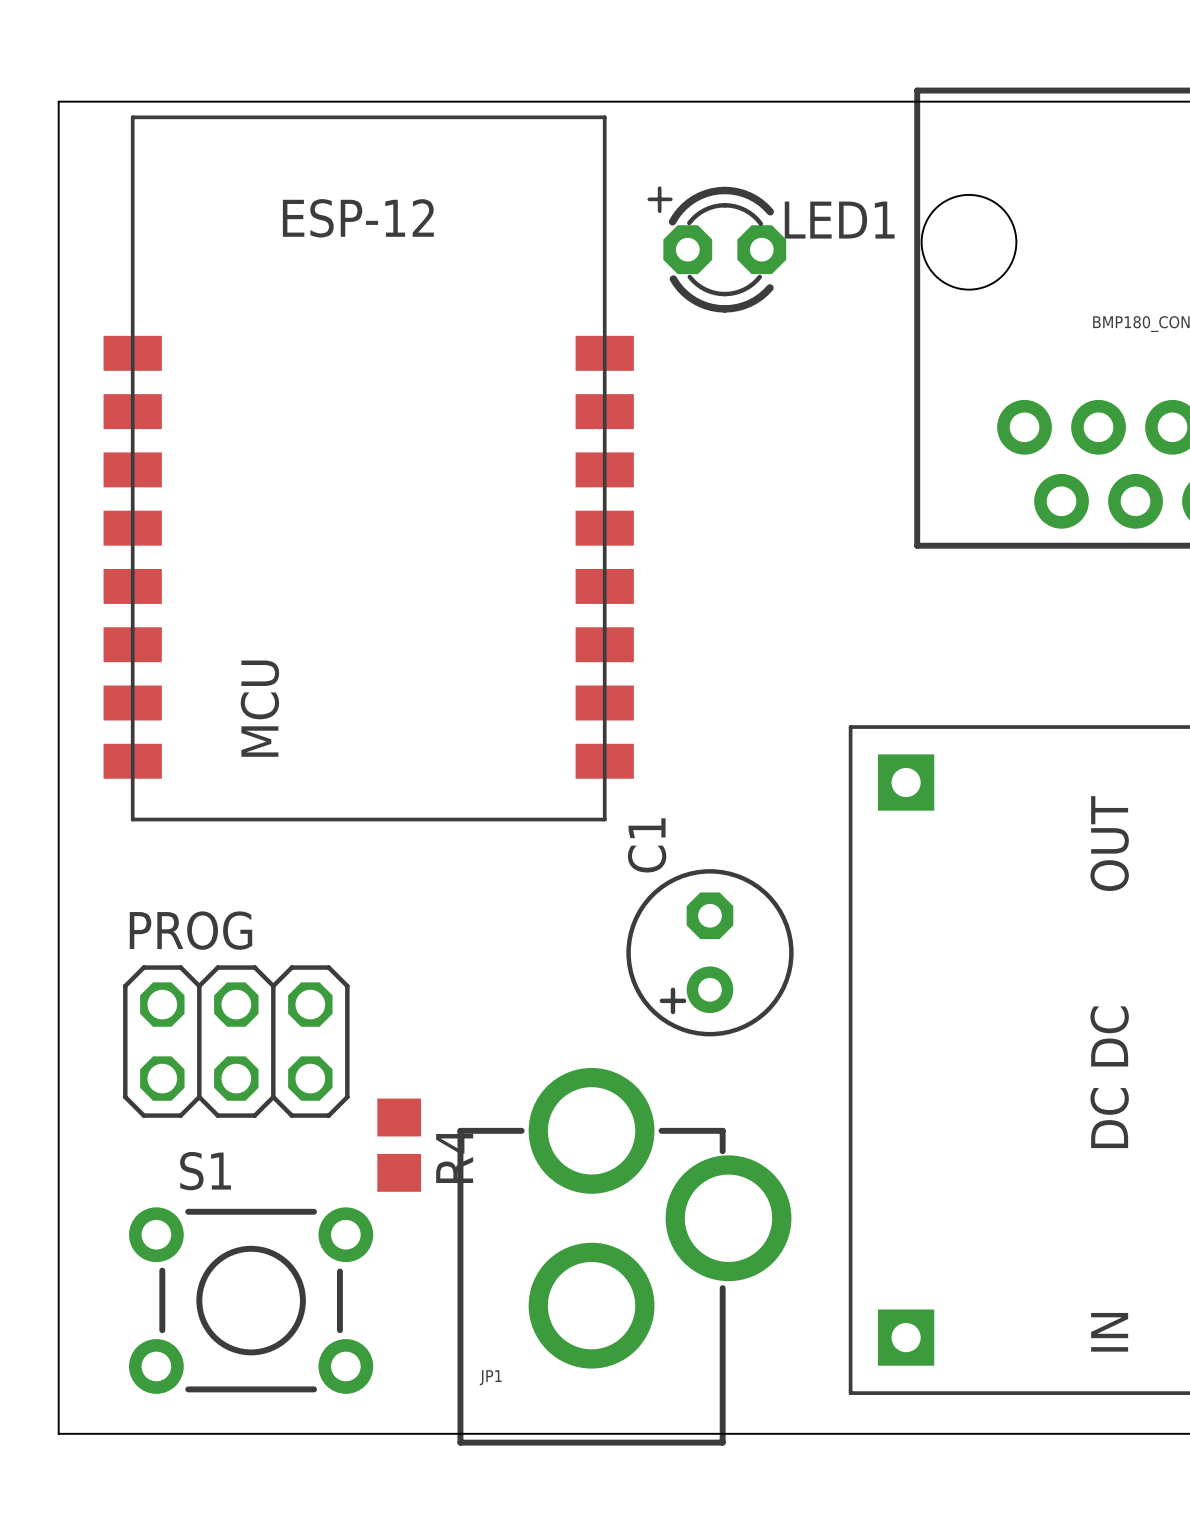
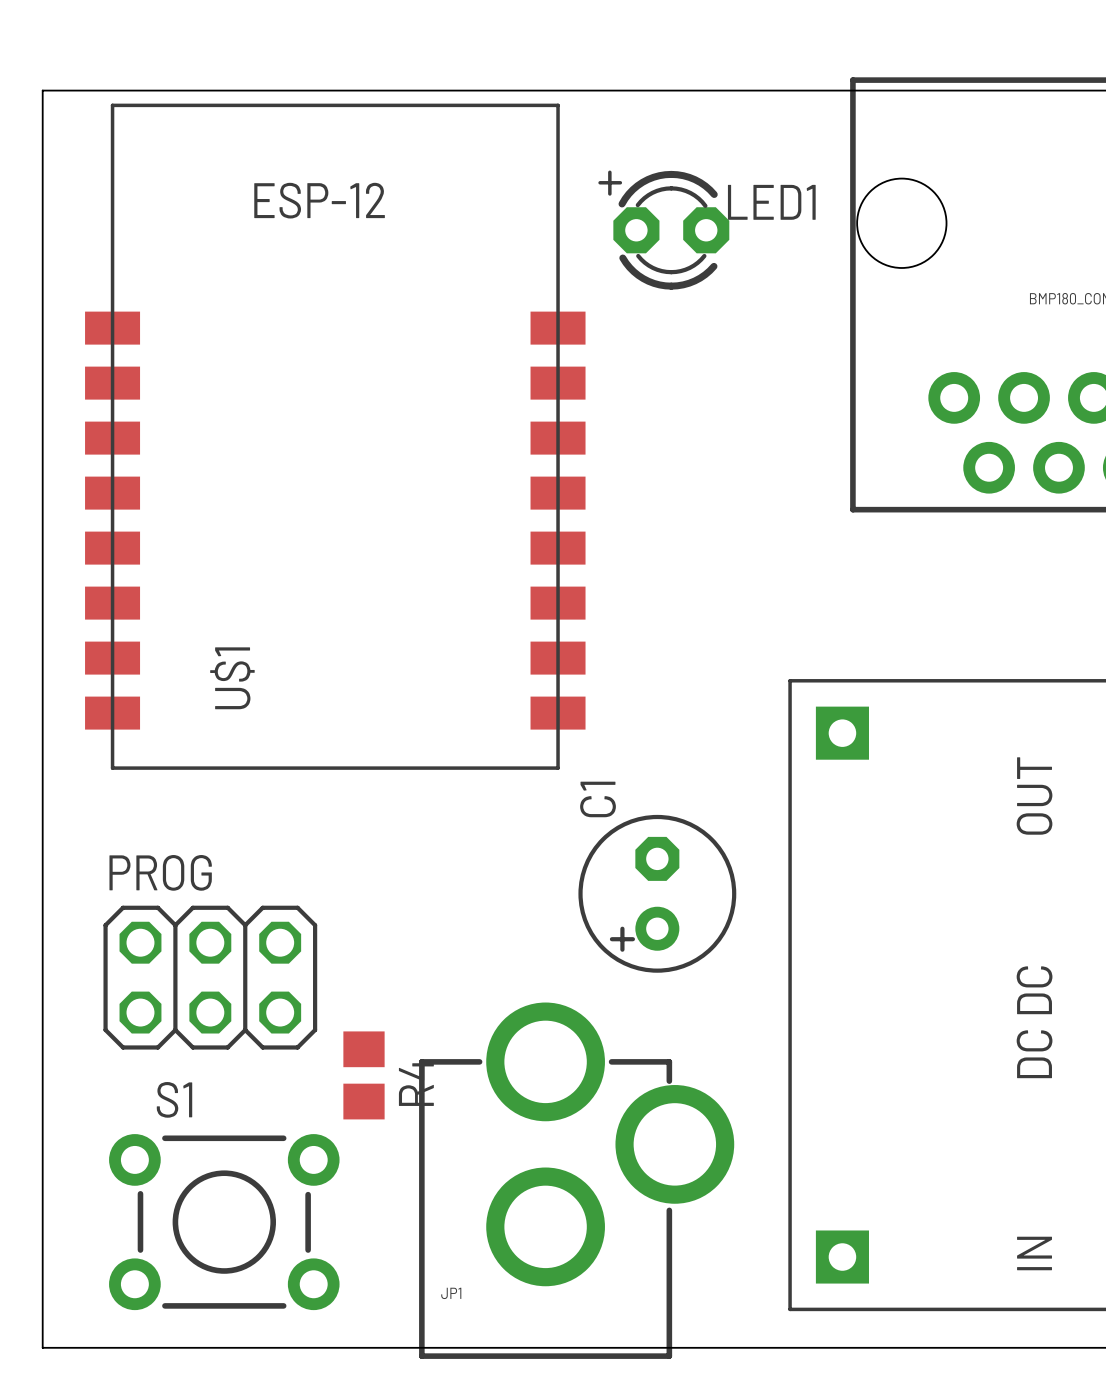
MCU name: MCU (259, 708) -> U$1 (232, 678)

